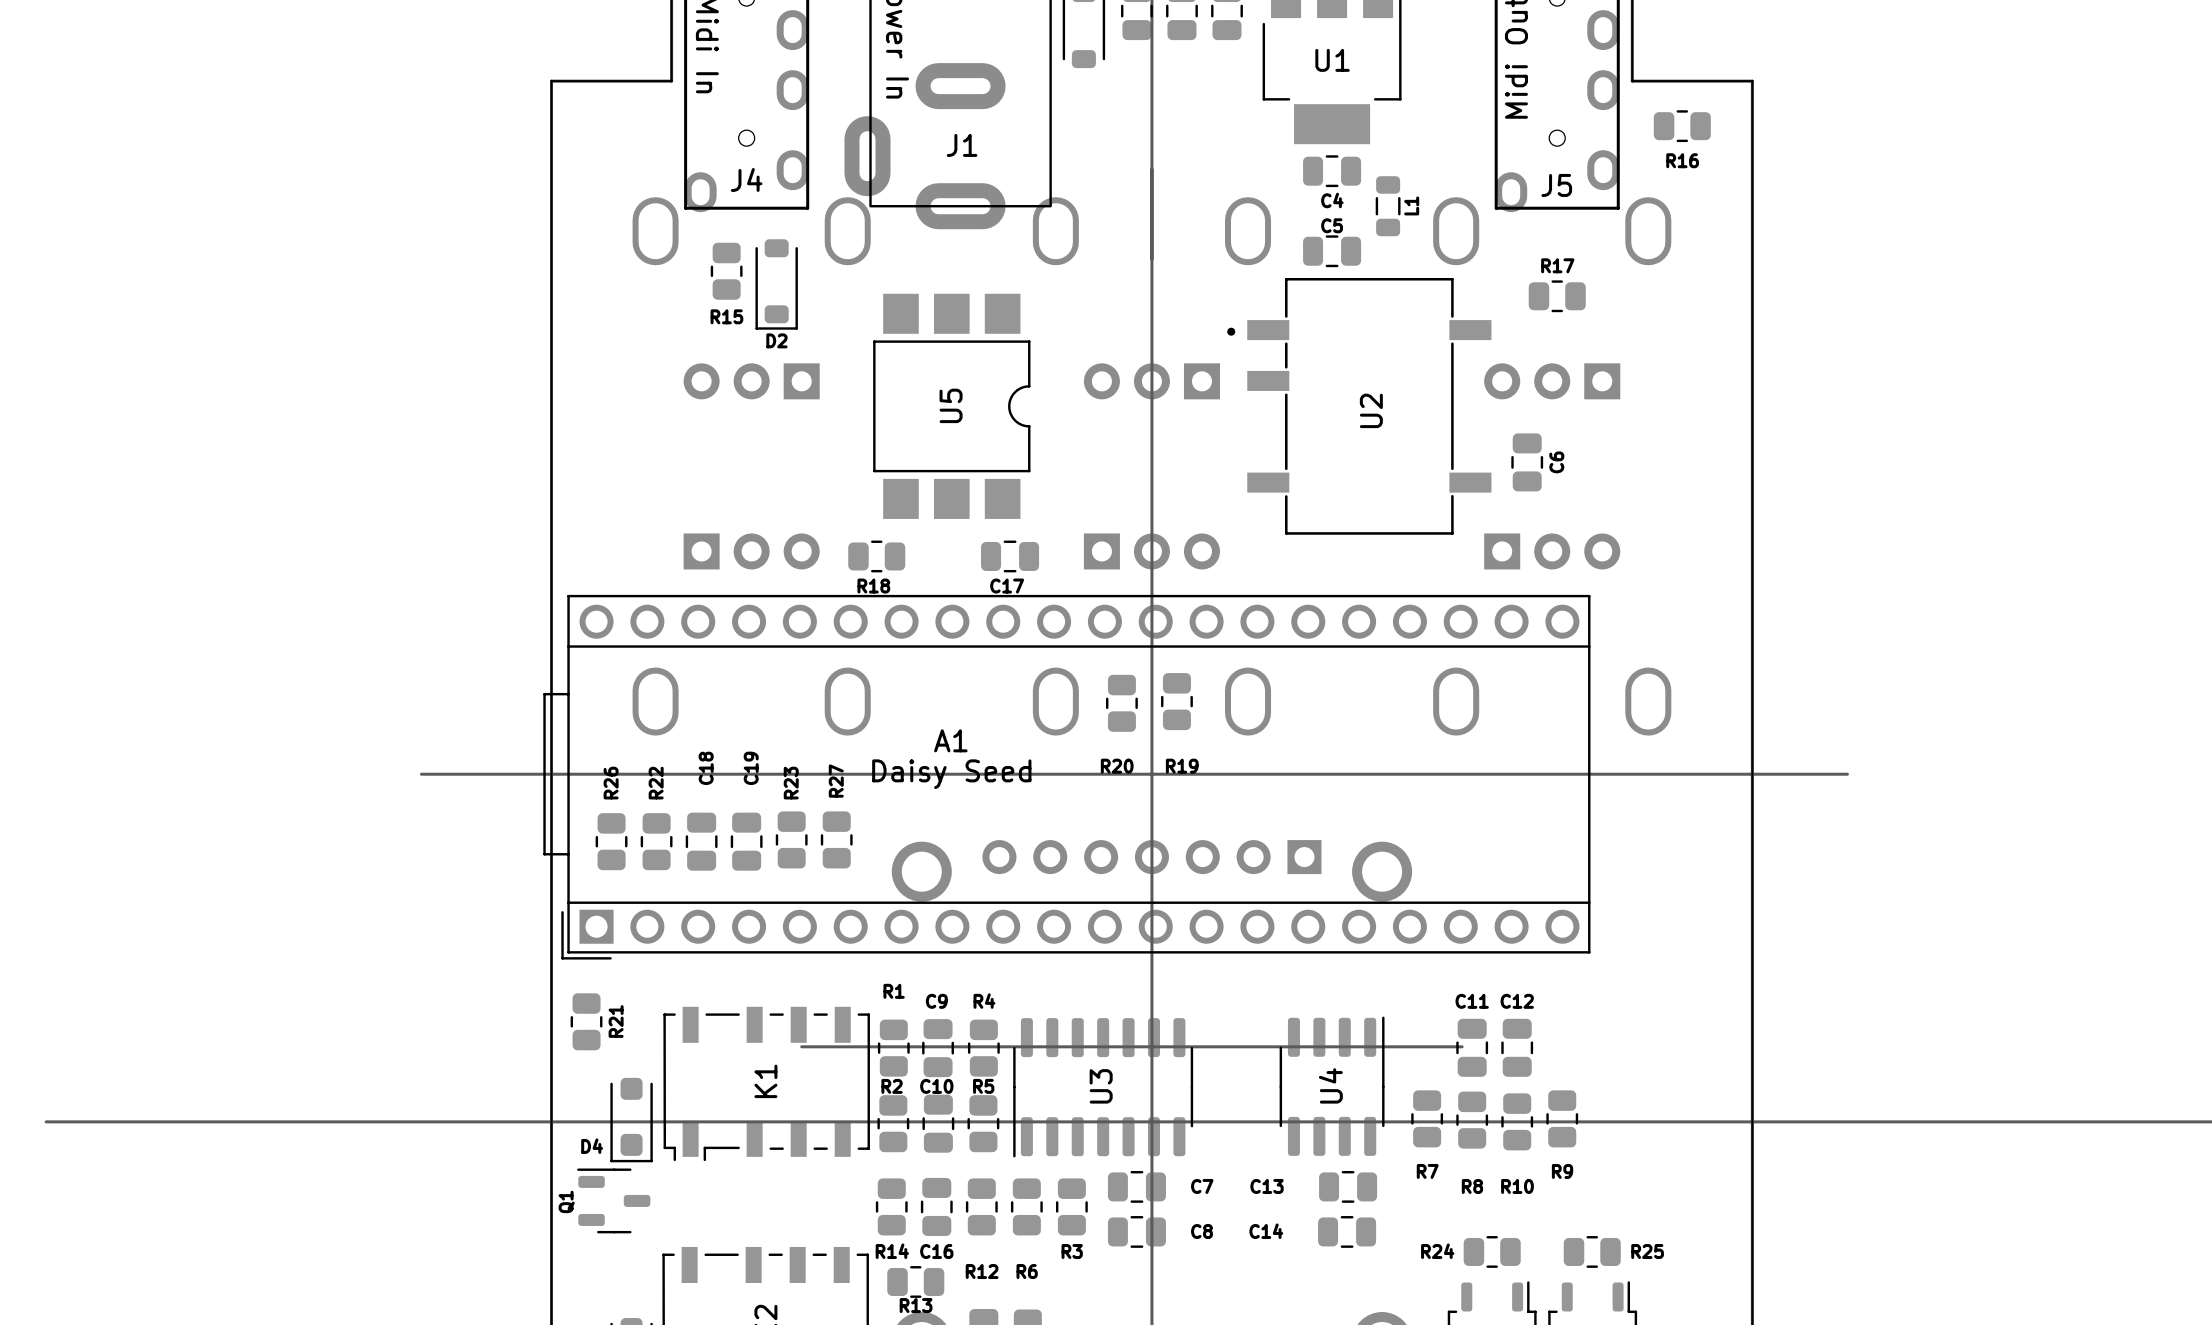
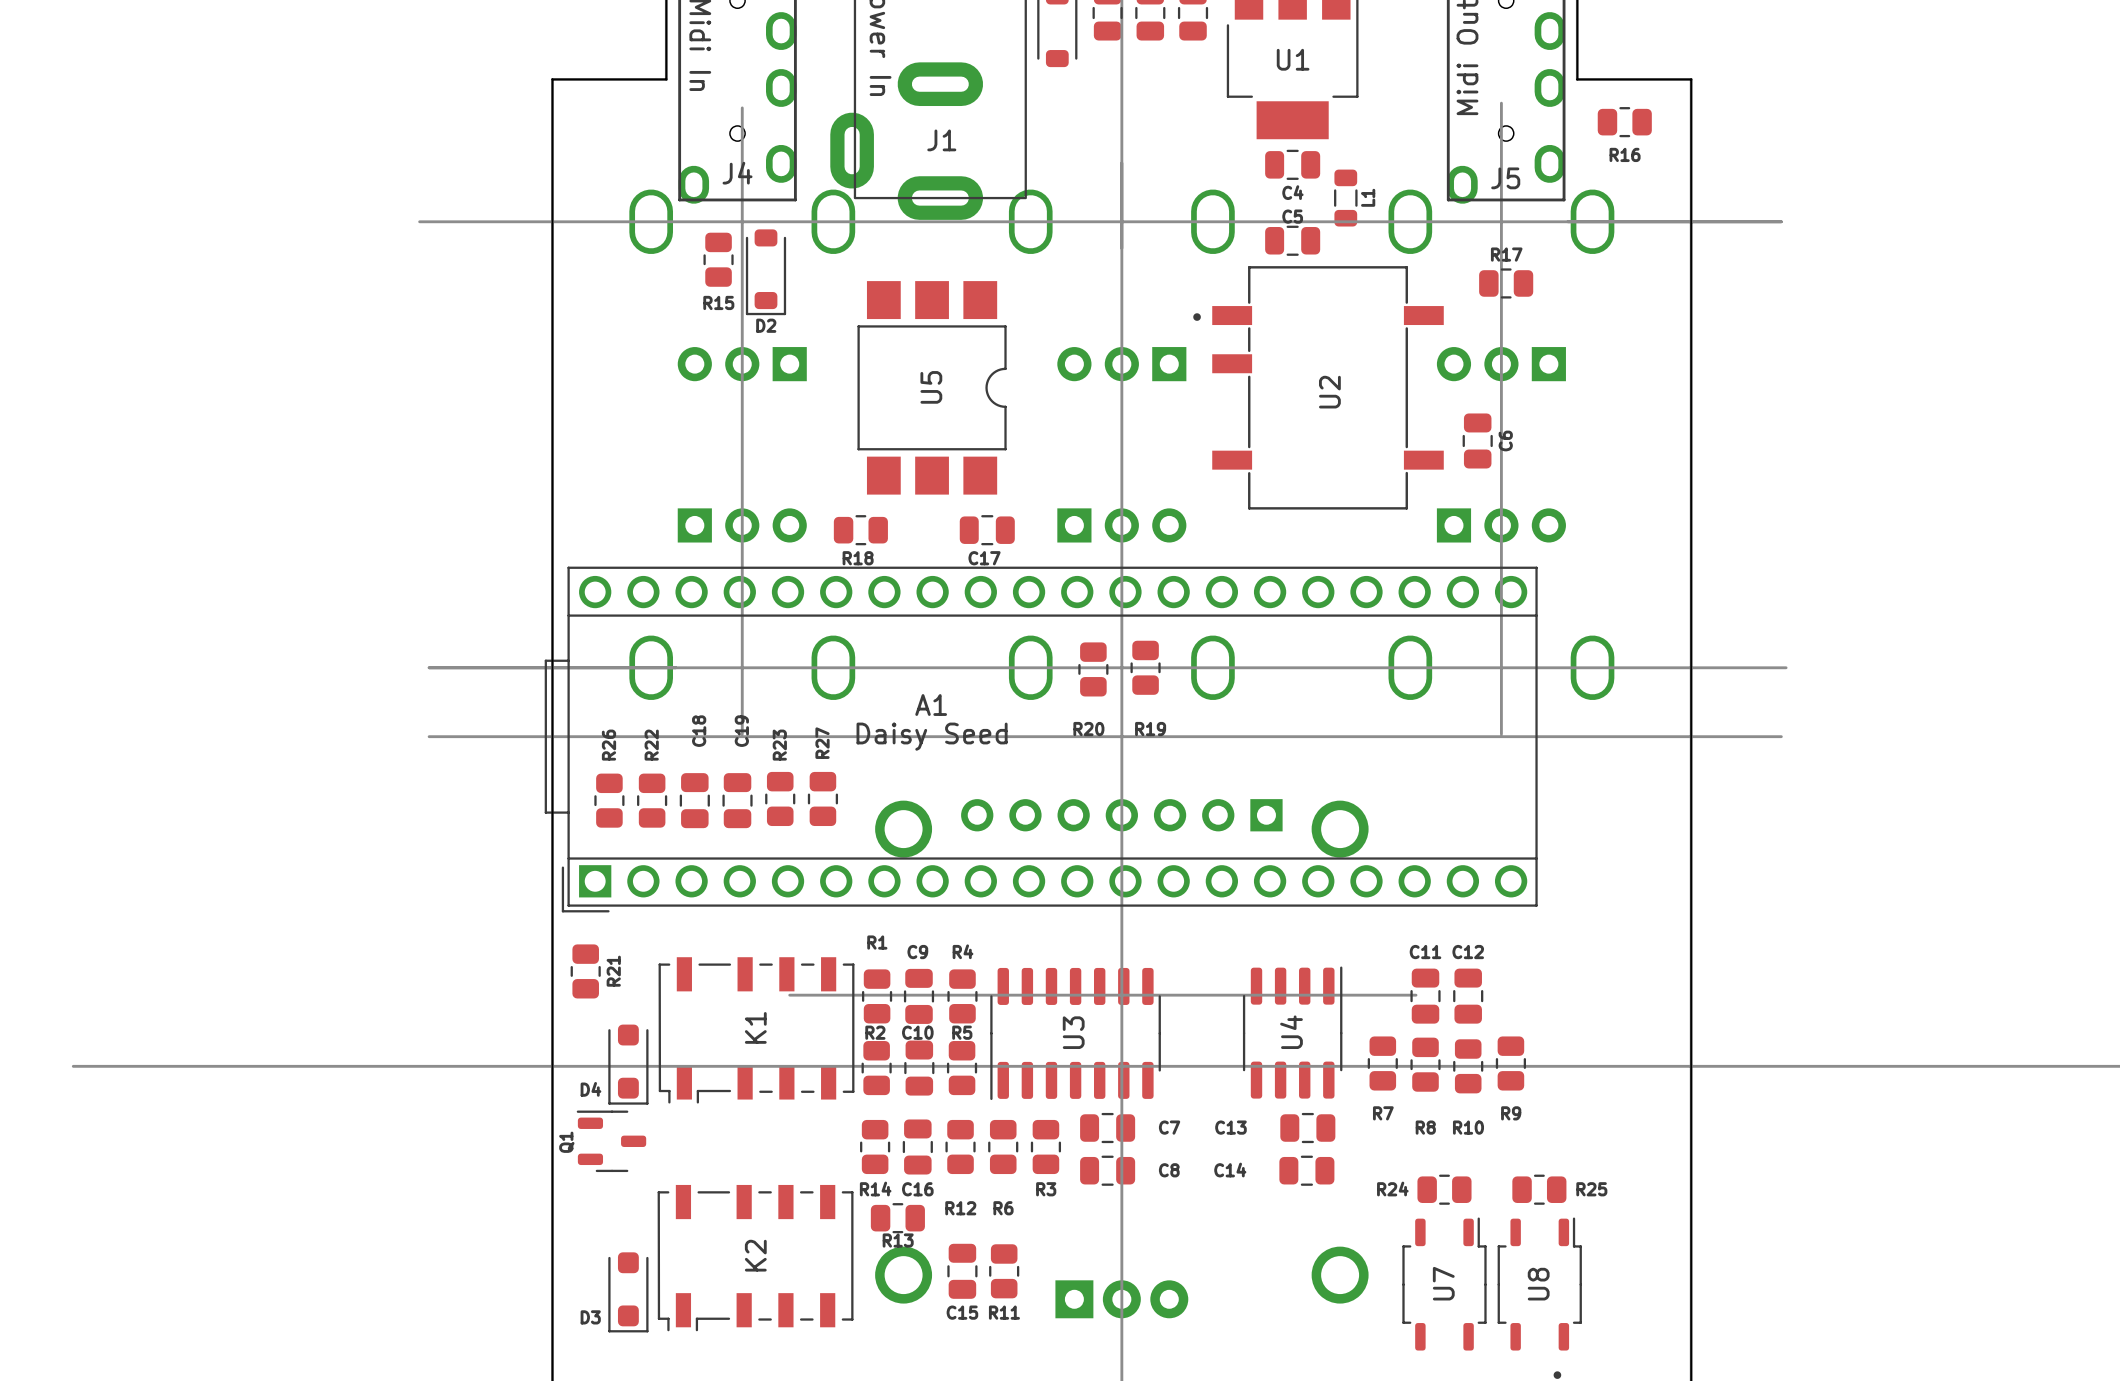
line: none -> (1501, 103) (1501, 734)
line: none -> (742, 107) (742, 734)
line: none -> (419, 221) (1781, 221)
line: none -> (429, 667) (1786, 667)

